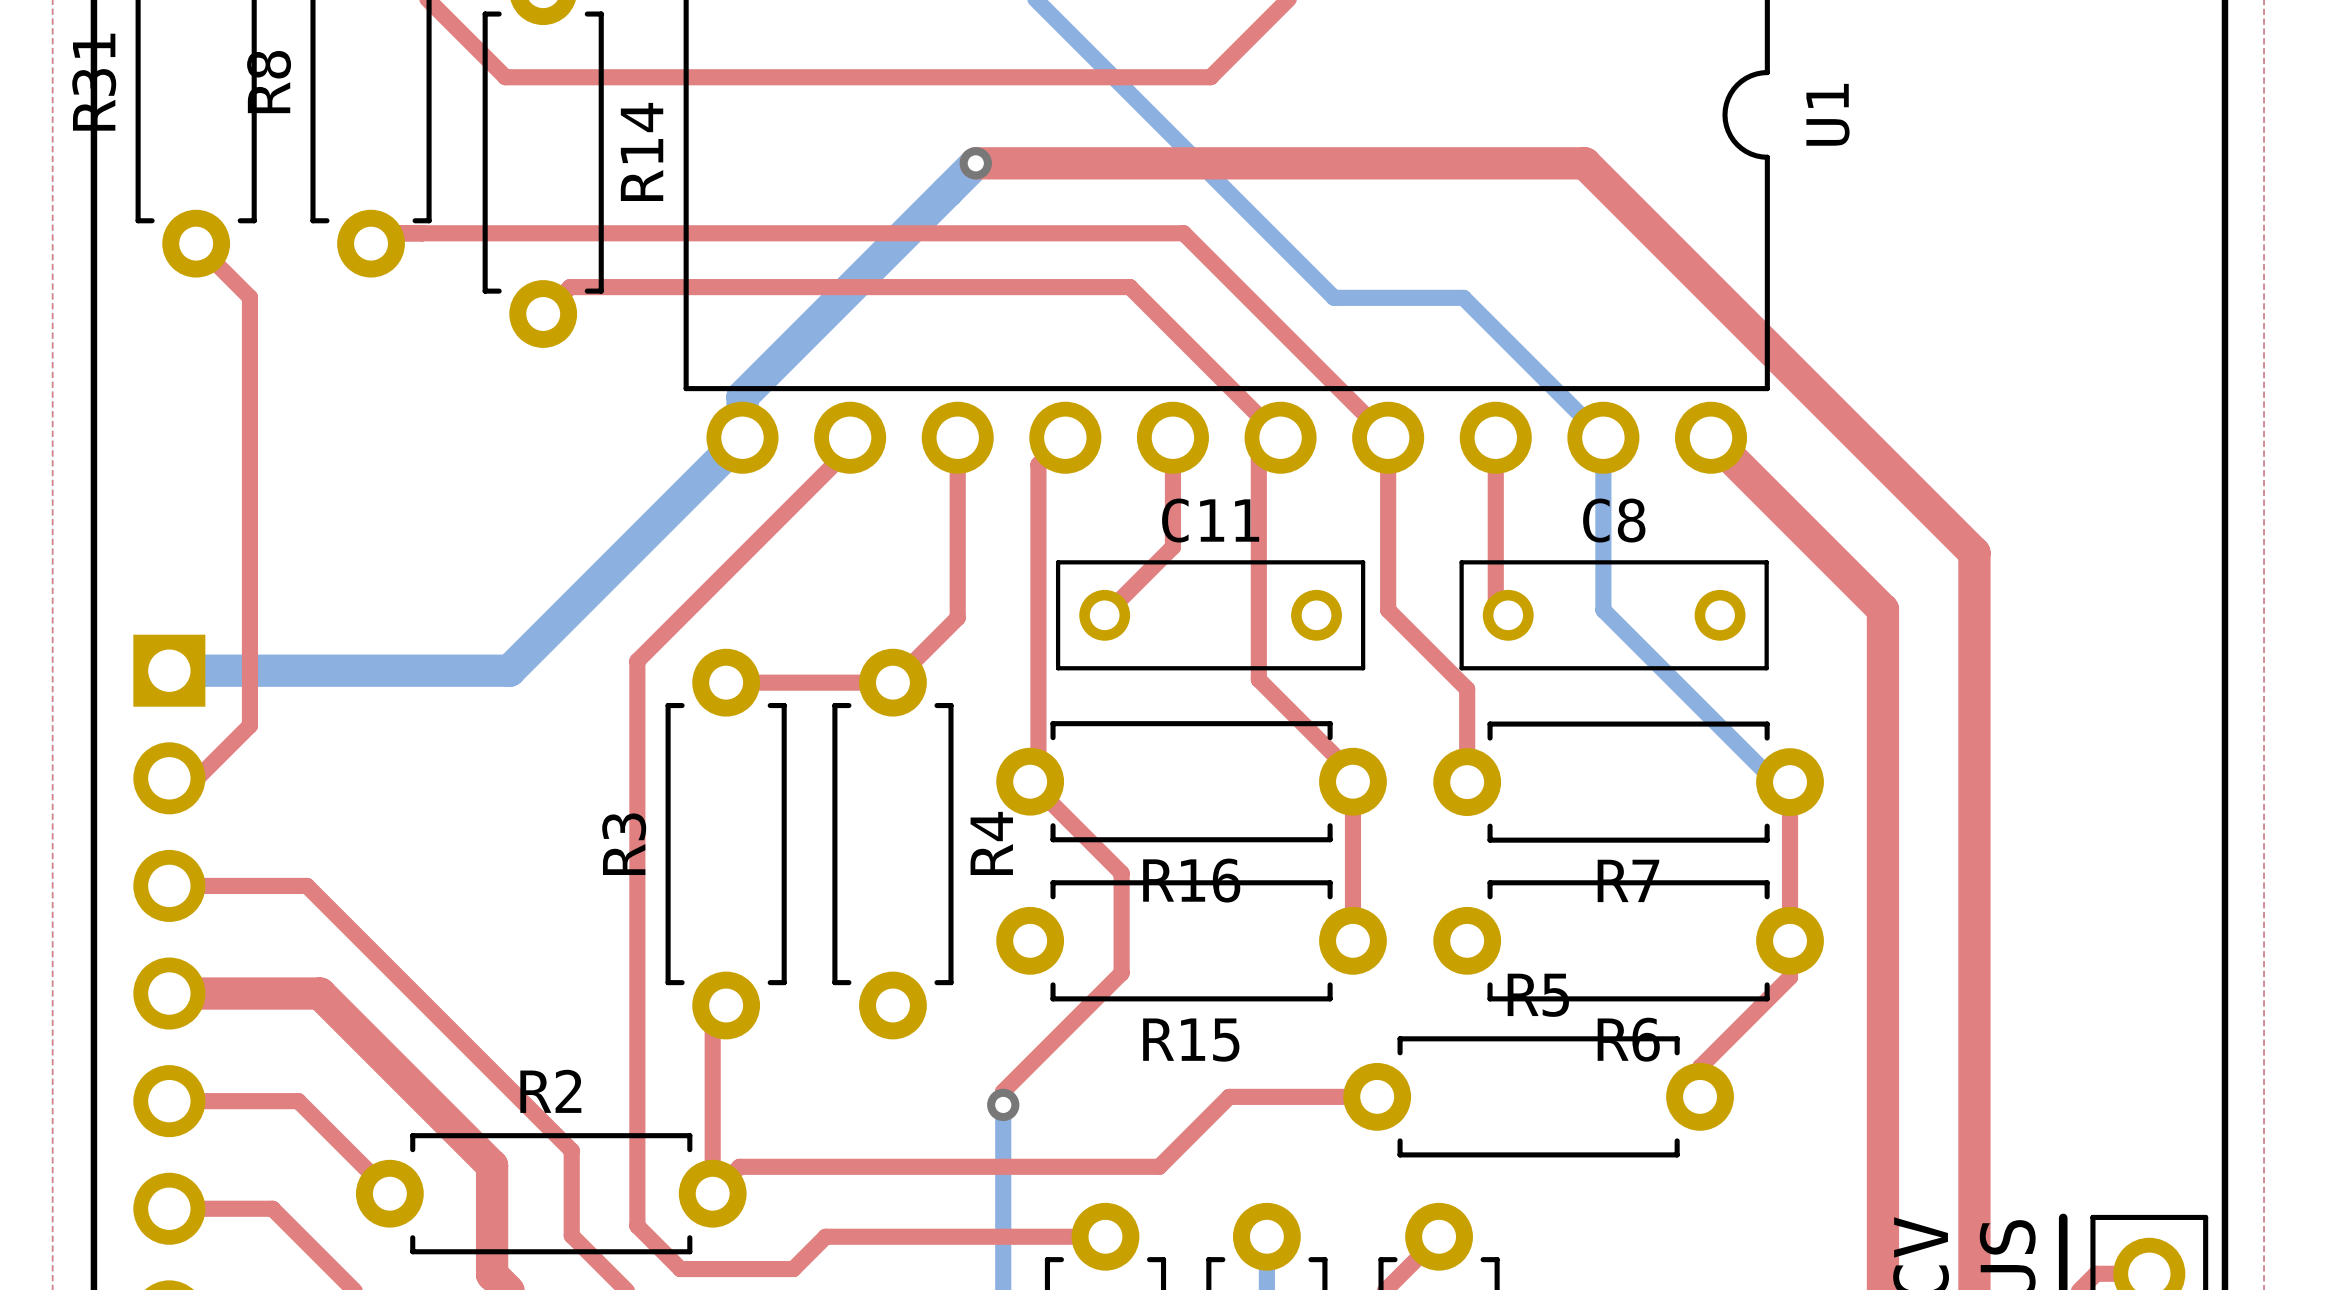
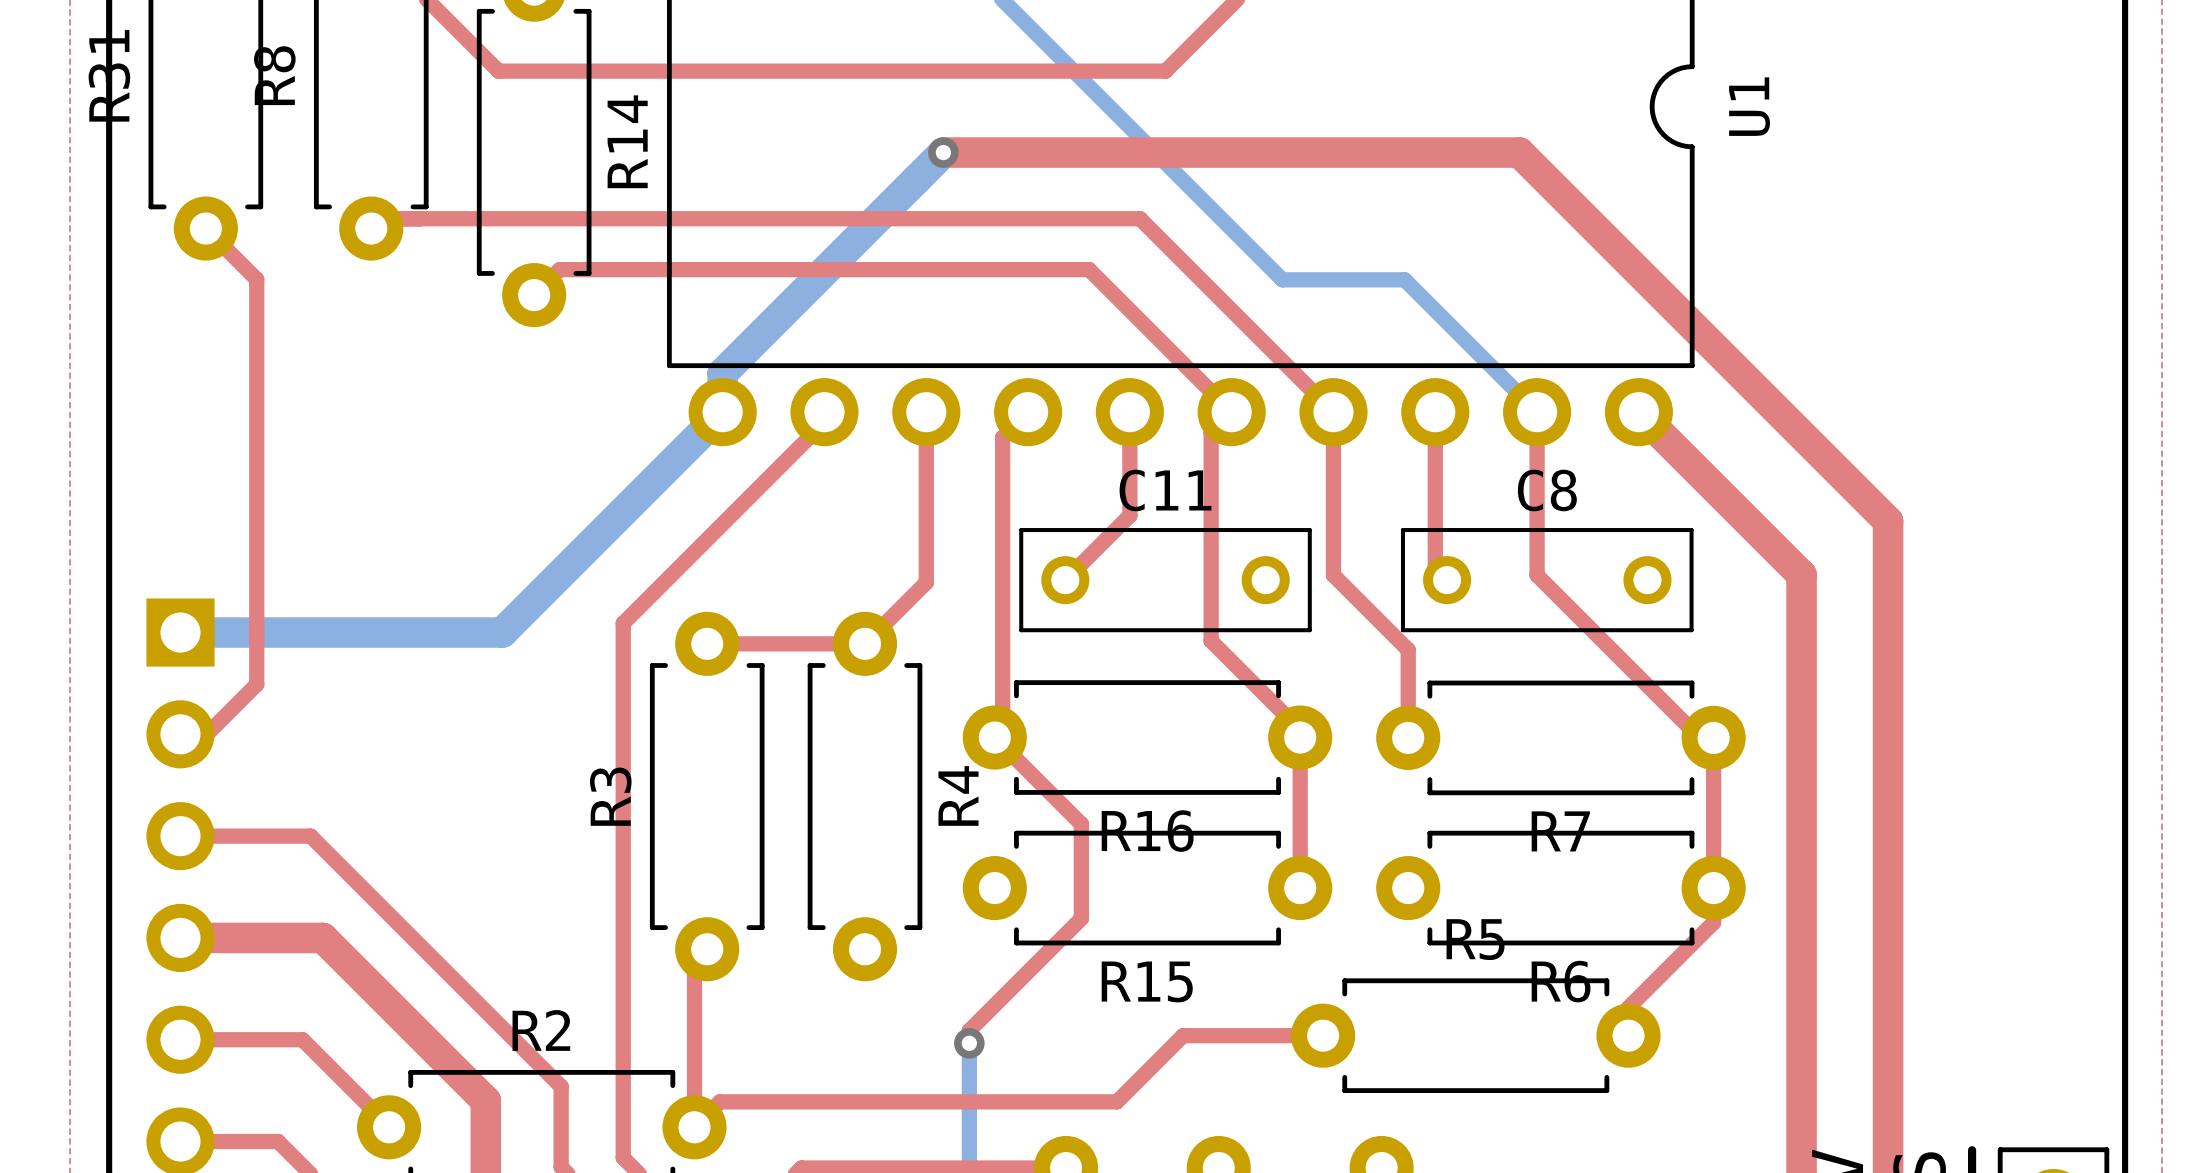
top track: none -> (1537, 412) (1537, 575) (1699, 737) (1713, 737)
bottom track: (1603, 437) (1603, 610) (1775, 782) (1790, 782) -> none

